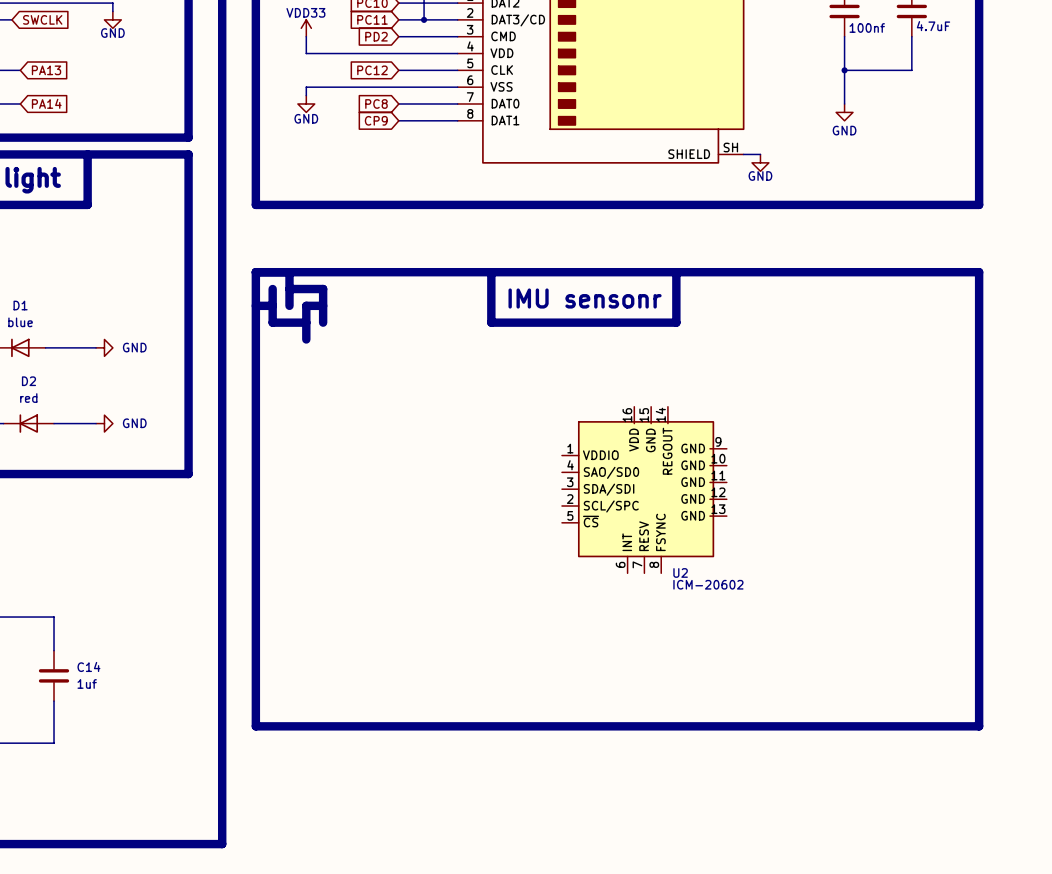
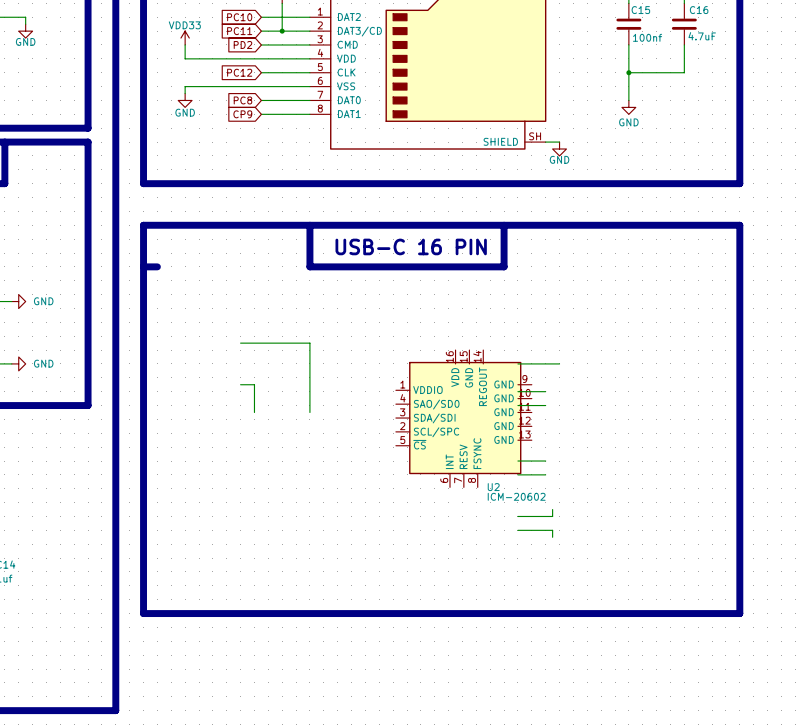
line: none -> (309, 225) (309, 266) (504, 266) (504, 225)
line: (255, 272) (979, 272) -> (143, 239) (143, 225) (739, 225) (739, 239)
line: (289, 272) (289, 305) -> none
line: (491, 272) (491, 322) (676, 322) (676, 272) -> none
text: none -> USB-C 16 PIN (411, 246)
line: (272, 289) (272, 322) (306, 322) -> none
line: (289, 289) (323, 289) (323, 322) -> none
text: IMU sensonr (585, 298) -> none
line: (323, 305) (306, 305) (306, 339) -> none
wire: none -> (240, 343) (309, 343) (309, 412)
wire: none -> (517, 363) (559, 363)
wire: none -> (240, 384) (254, 384) (254, 412)
wire: none -> (517, 391) (545, 391)
wire: none -> (517, 405) (545, 405)
wire: none -> (517, 461) (545, 461)
wire: none -> (517, 474) (545, 474)
wire: none -> (552, 509) (552, 516) (517, 516)
wire: none -> (517, 530) (552, 530) (552, 537)

